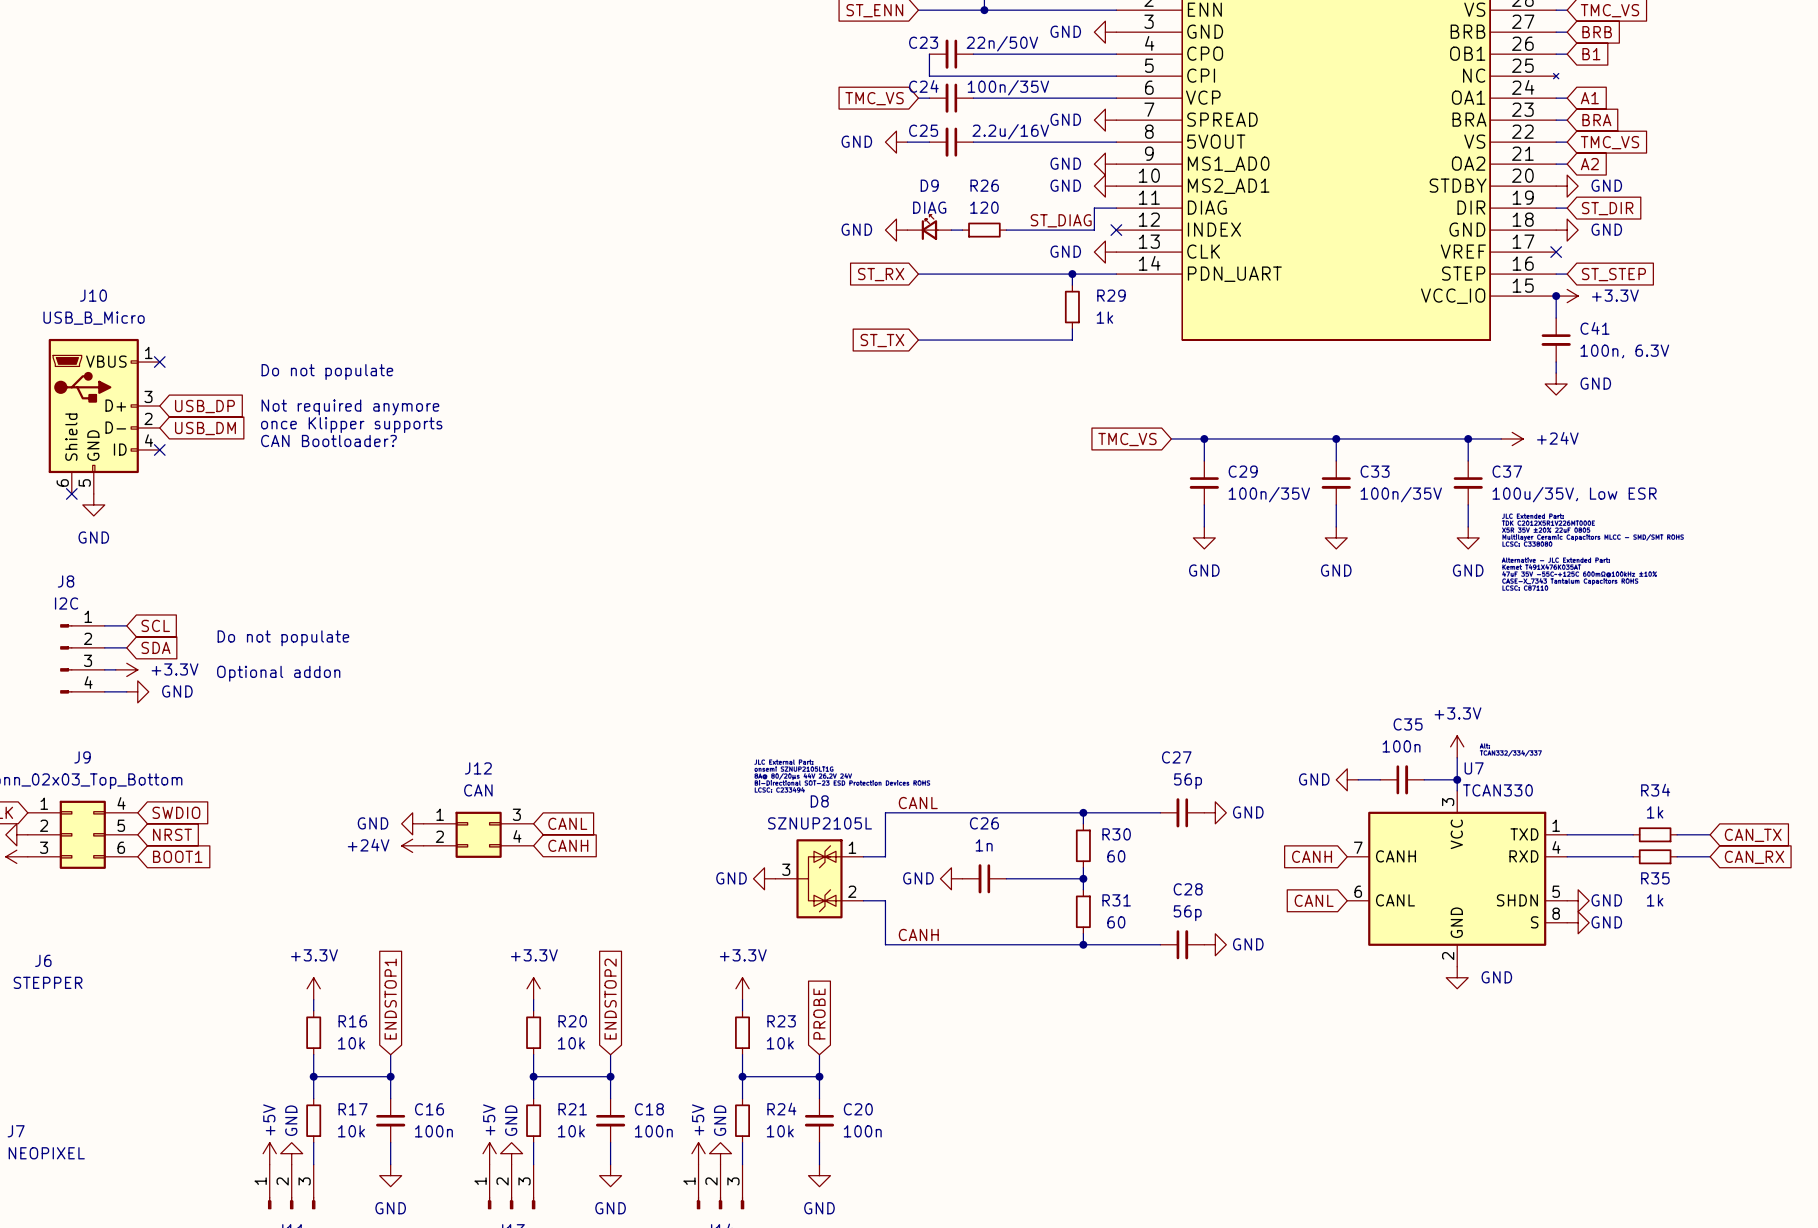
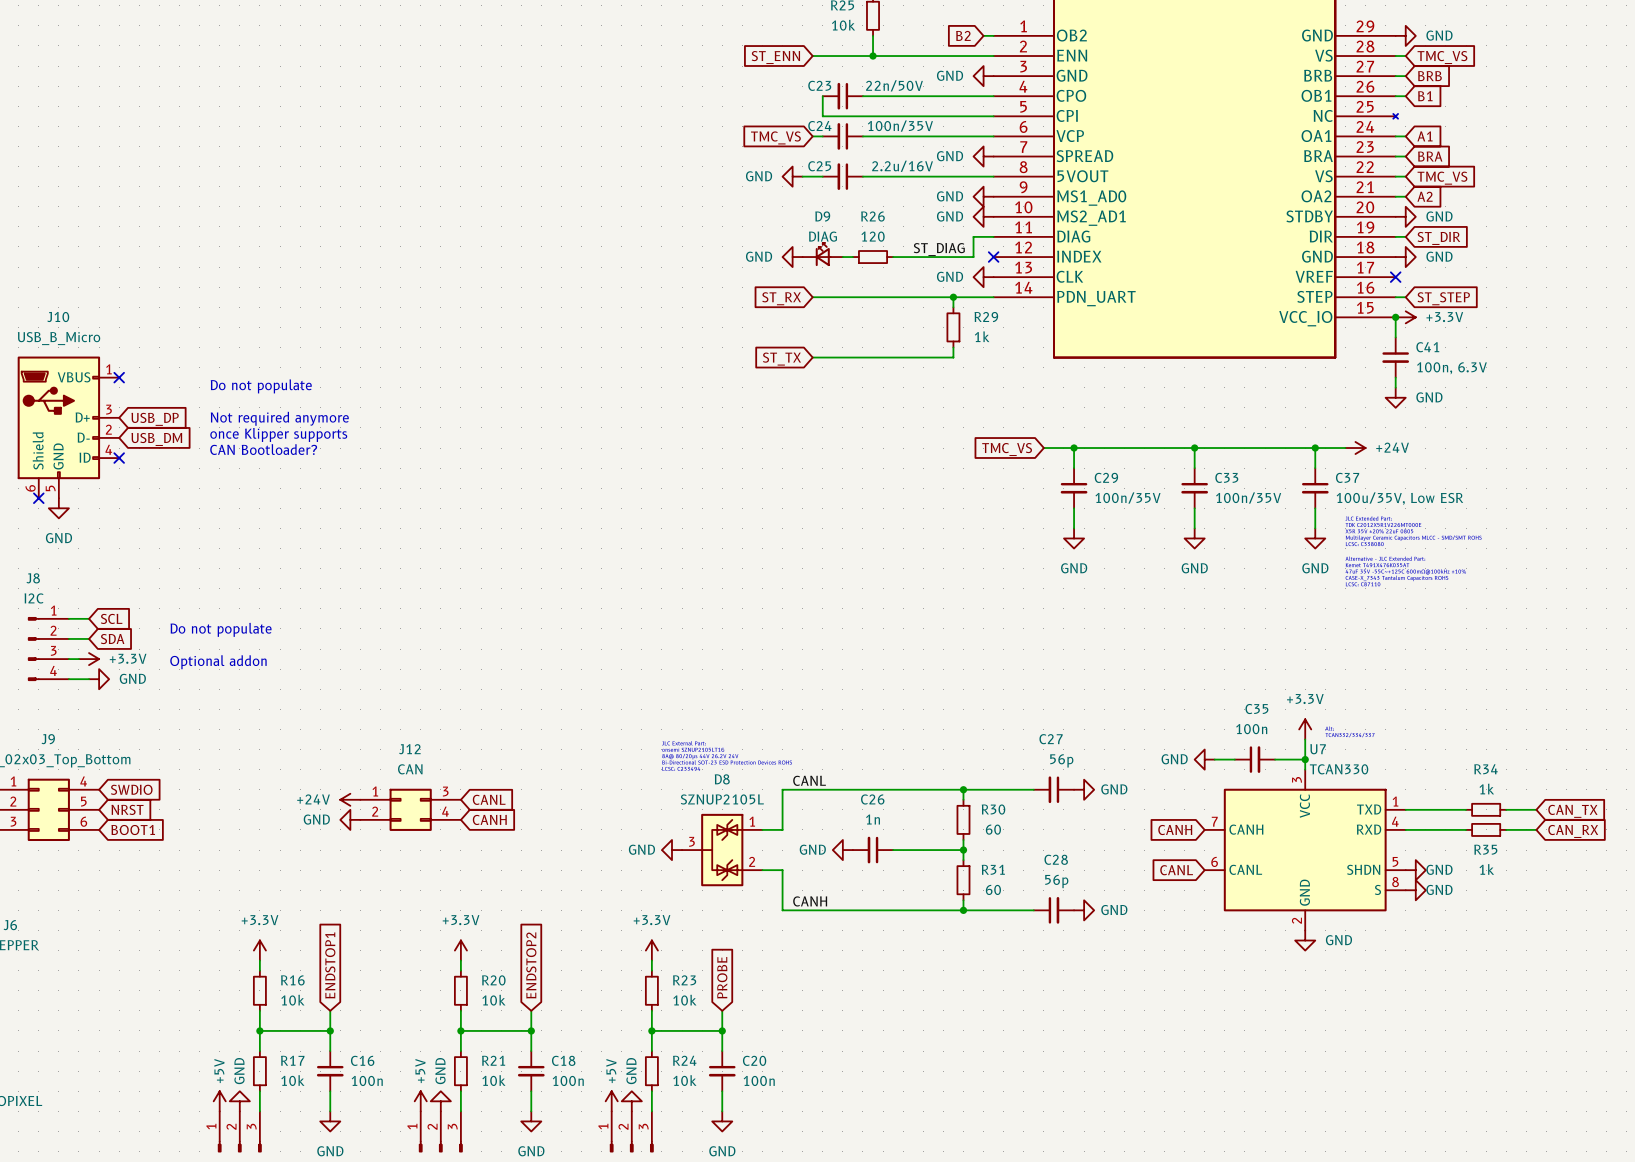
power symbol: GND (412, 823) -> +24V (350, 799)
power symbol: +24V (412, 845) -> GND (350, 819)

